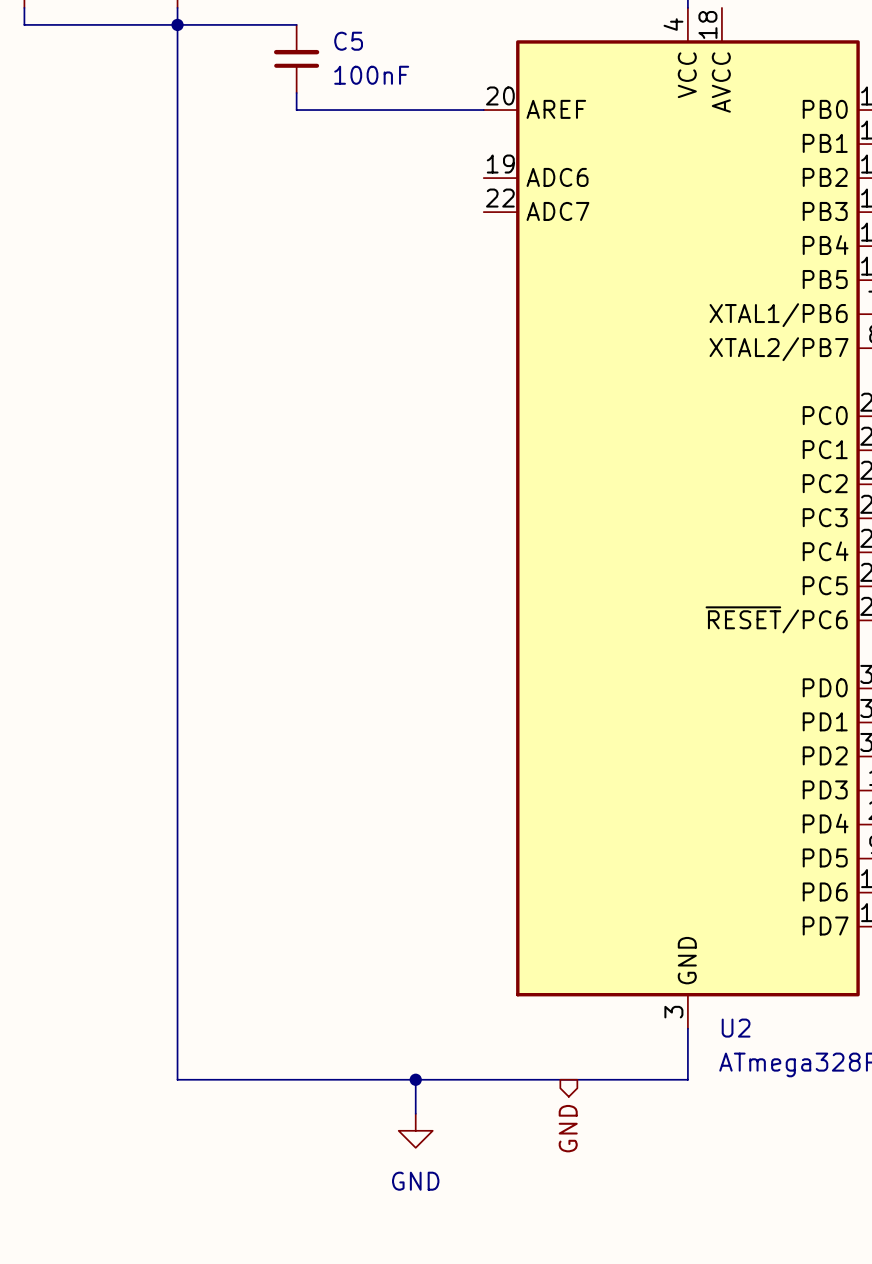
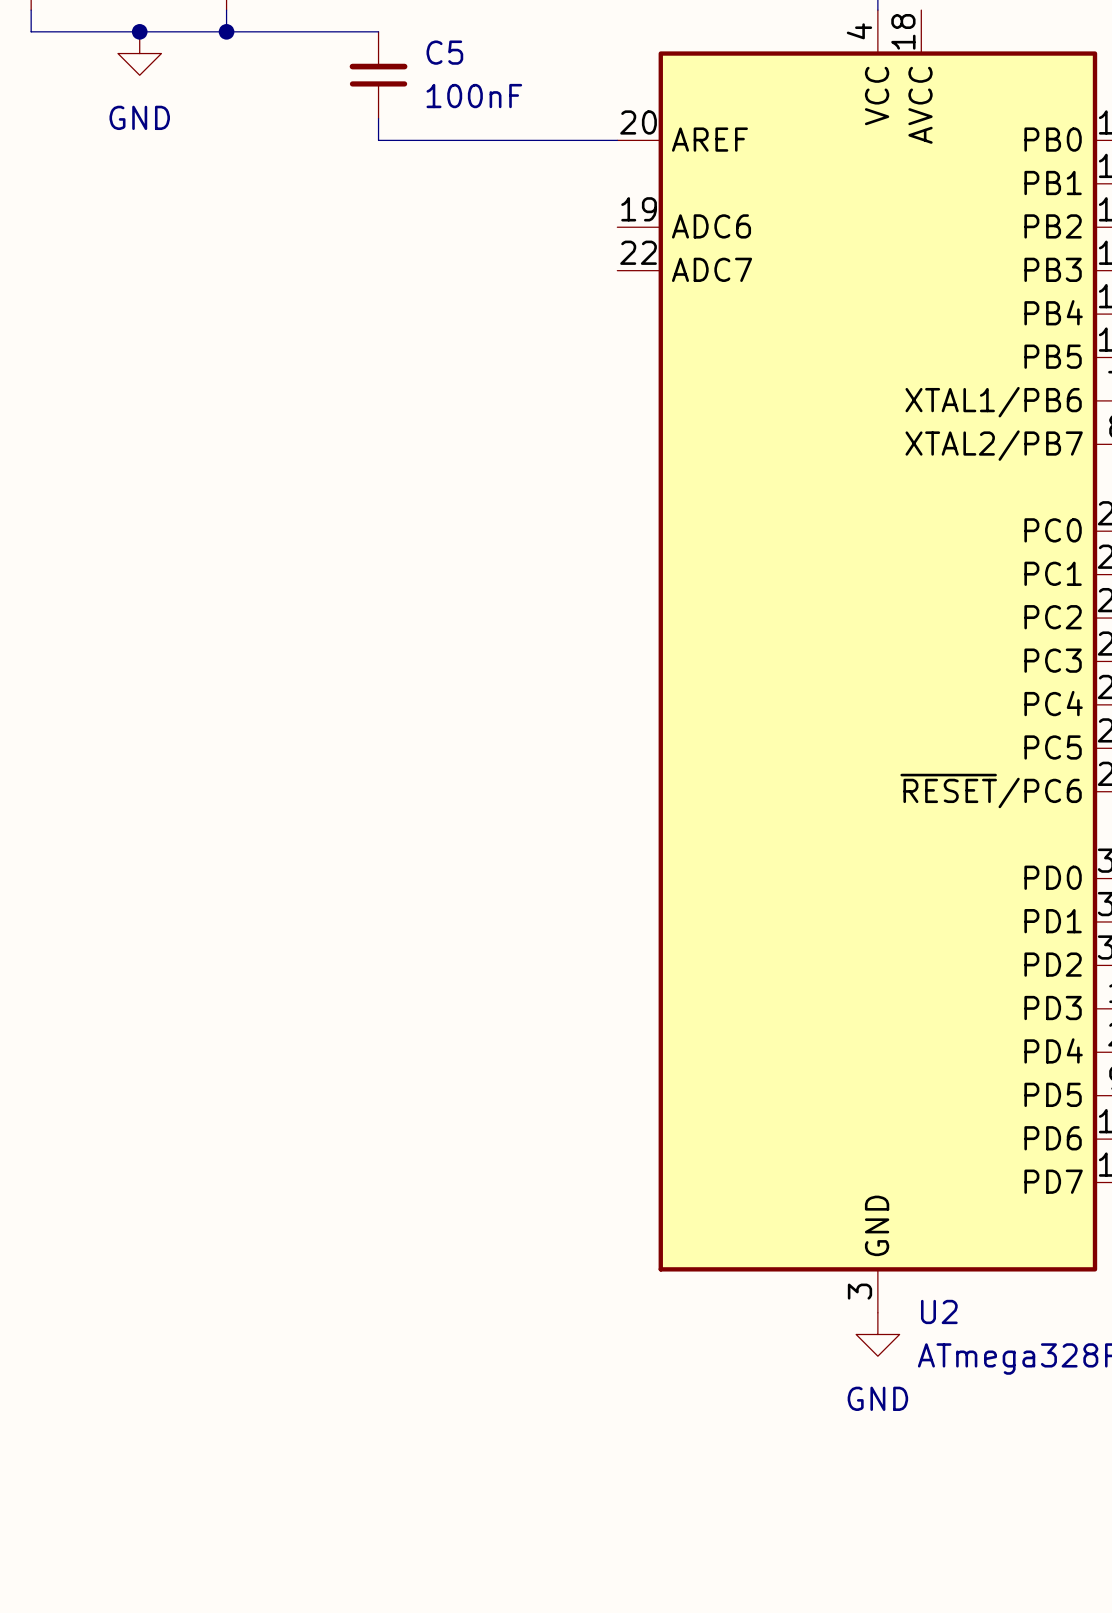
junction: none -> (139, 31)
wire: (177, 24) (177, 1079) (687, 1079) (687, 1028) -> none
power symbol: none -> GND (139, 53)
wire: (415, 1079) (415, 1113) -> none
junction: (415, 1079) -> none
hierarchical label: GND (568, 1128) -> none
power symbol position: GND (415, 1130) -> GND (877, 1334)

